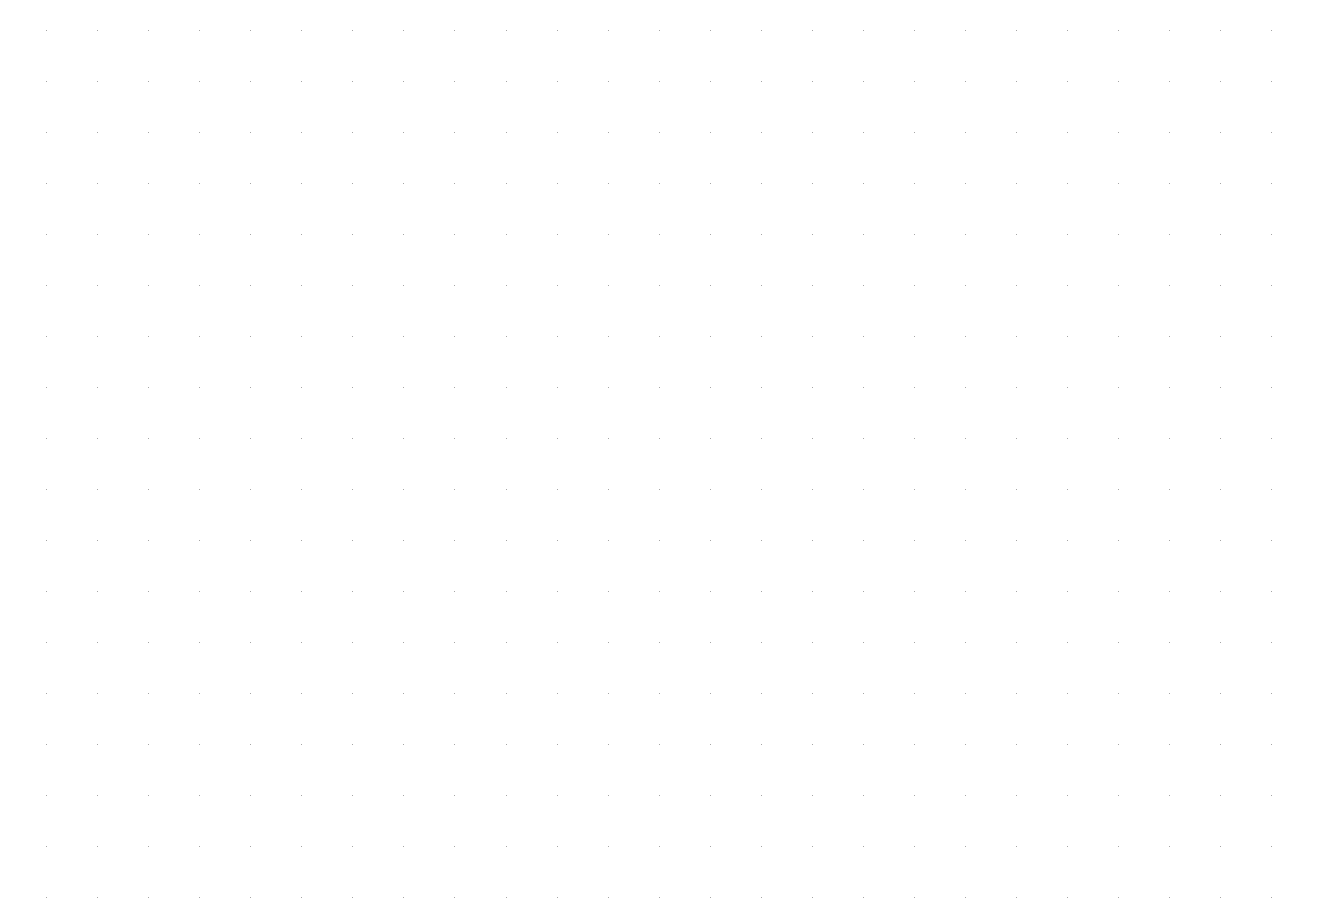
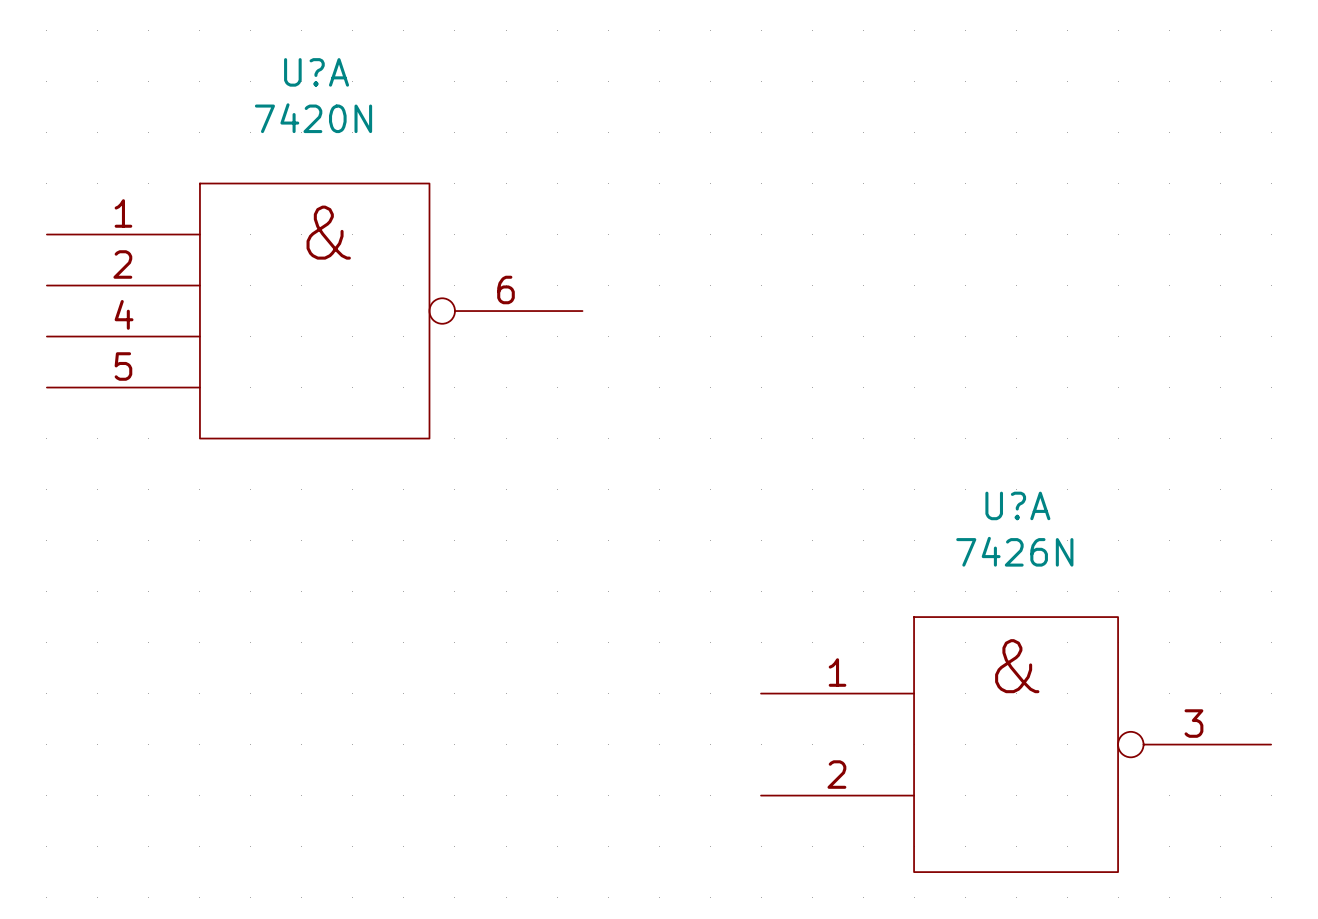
U?A: none -> 7420N (314, 311)
U?A: none -> 7426N (1016, 744)

